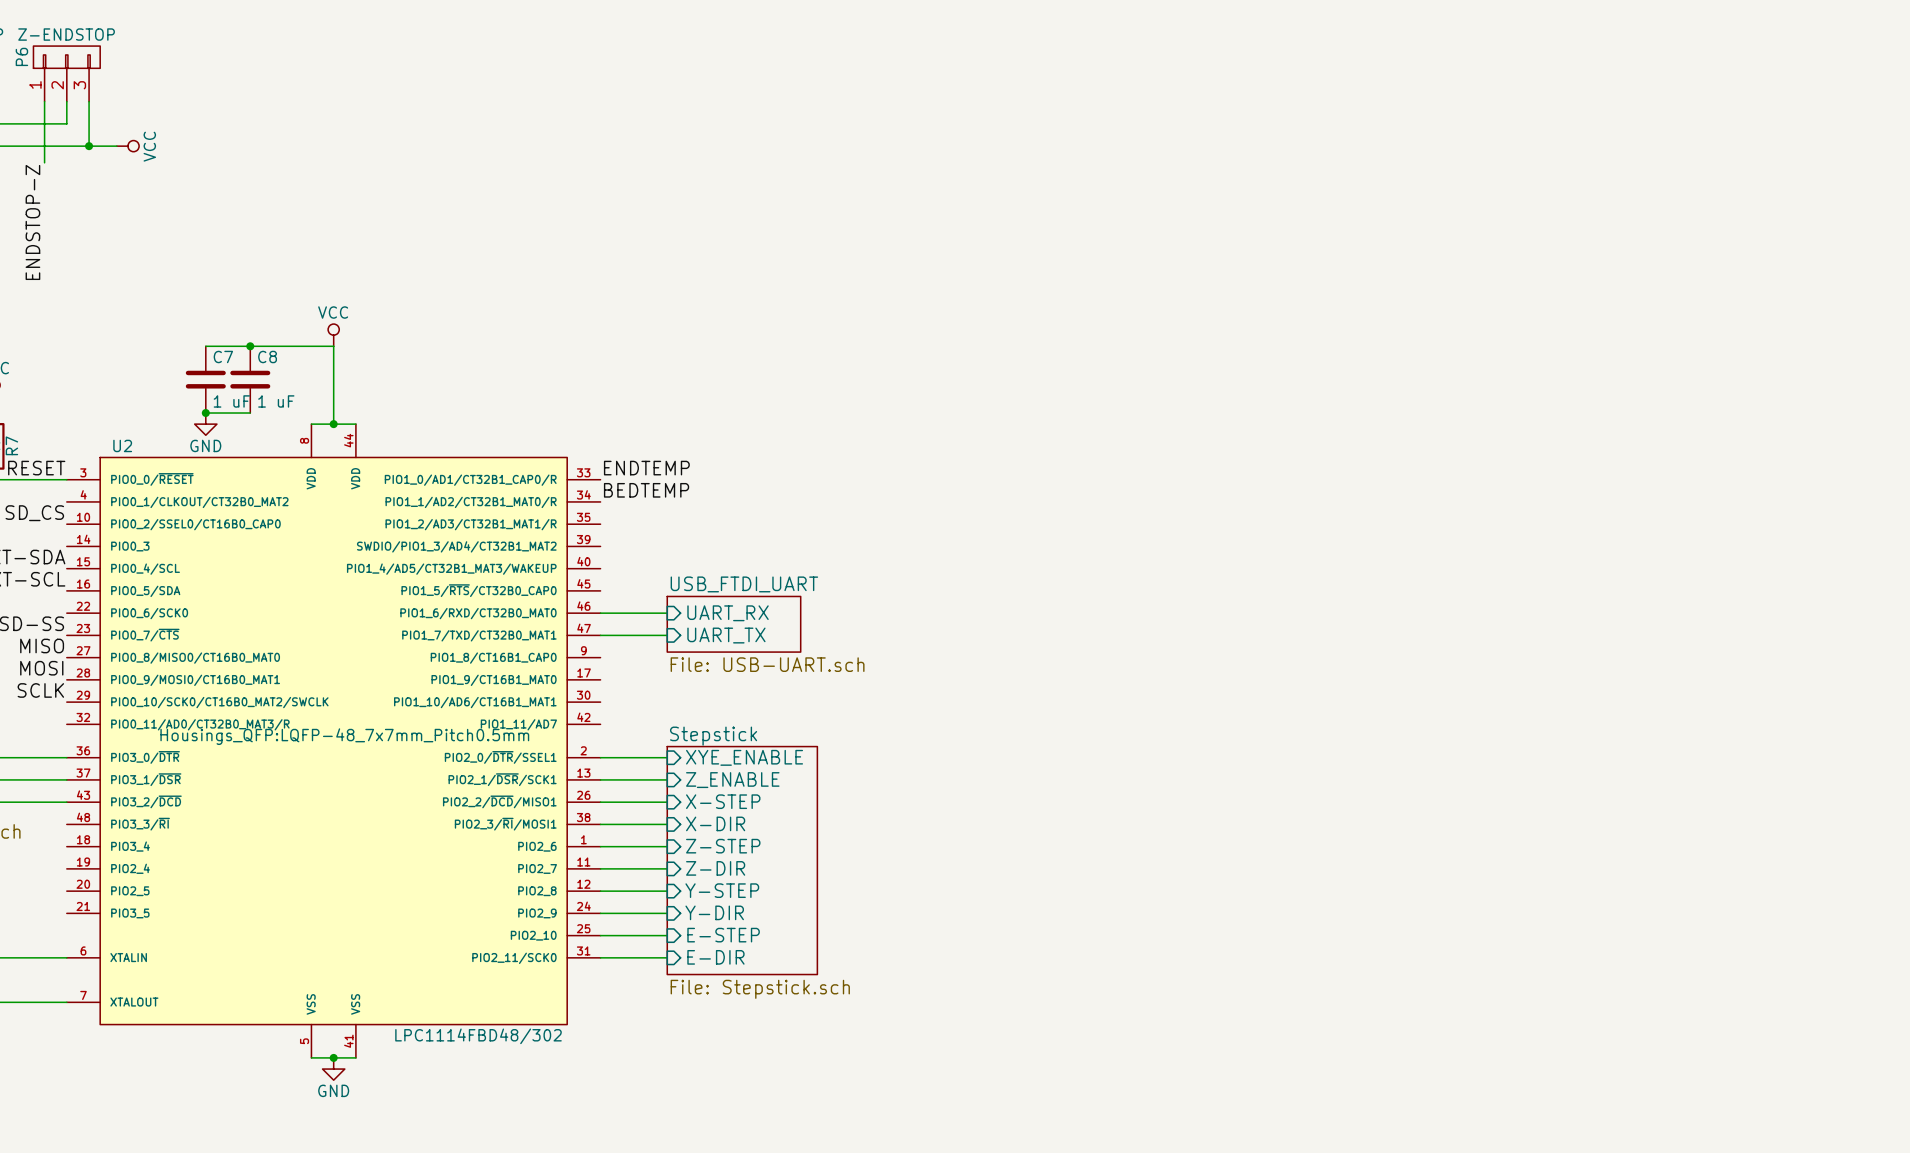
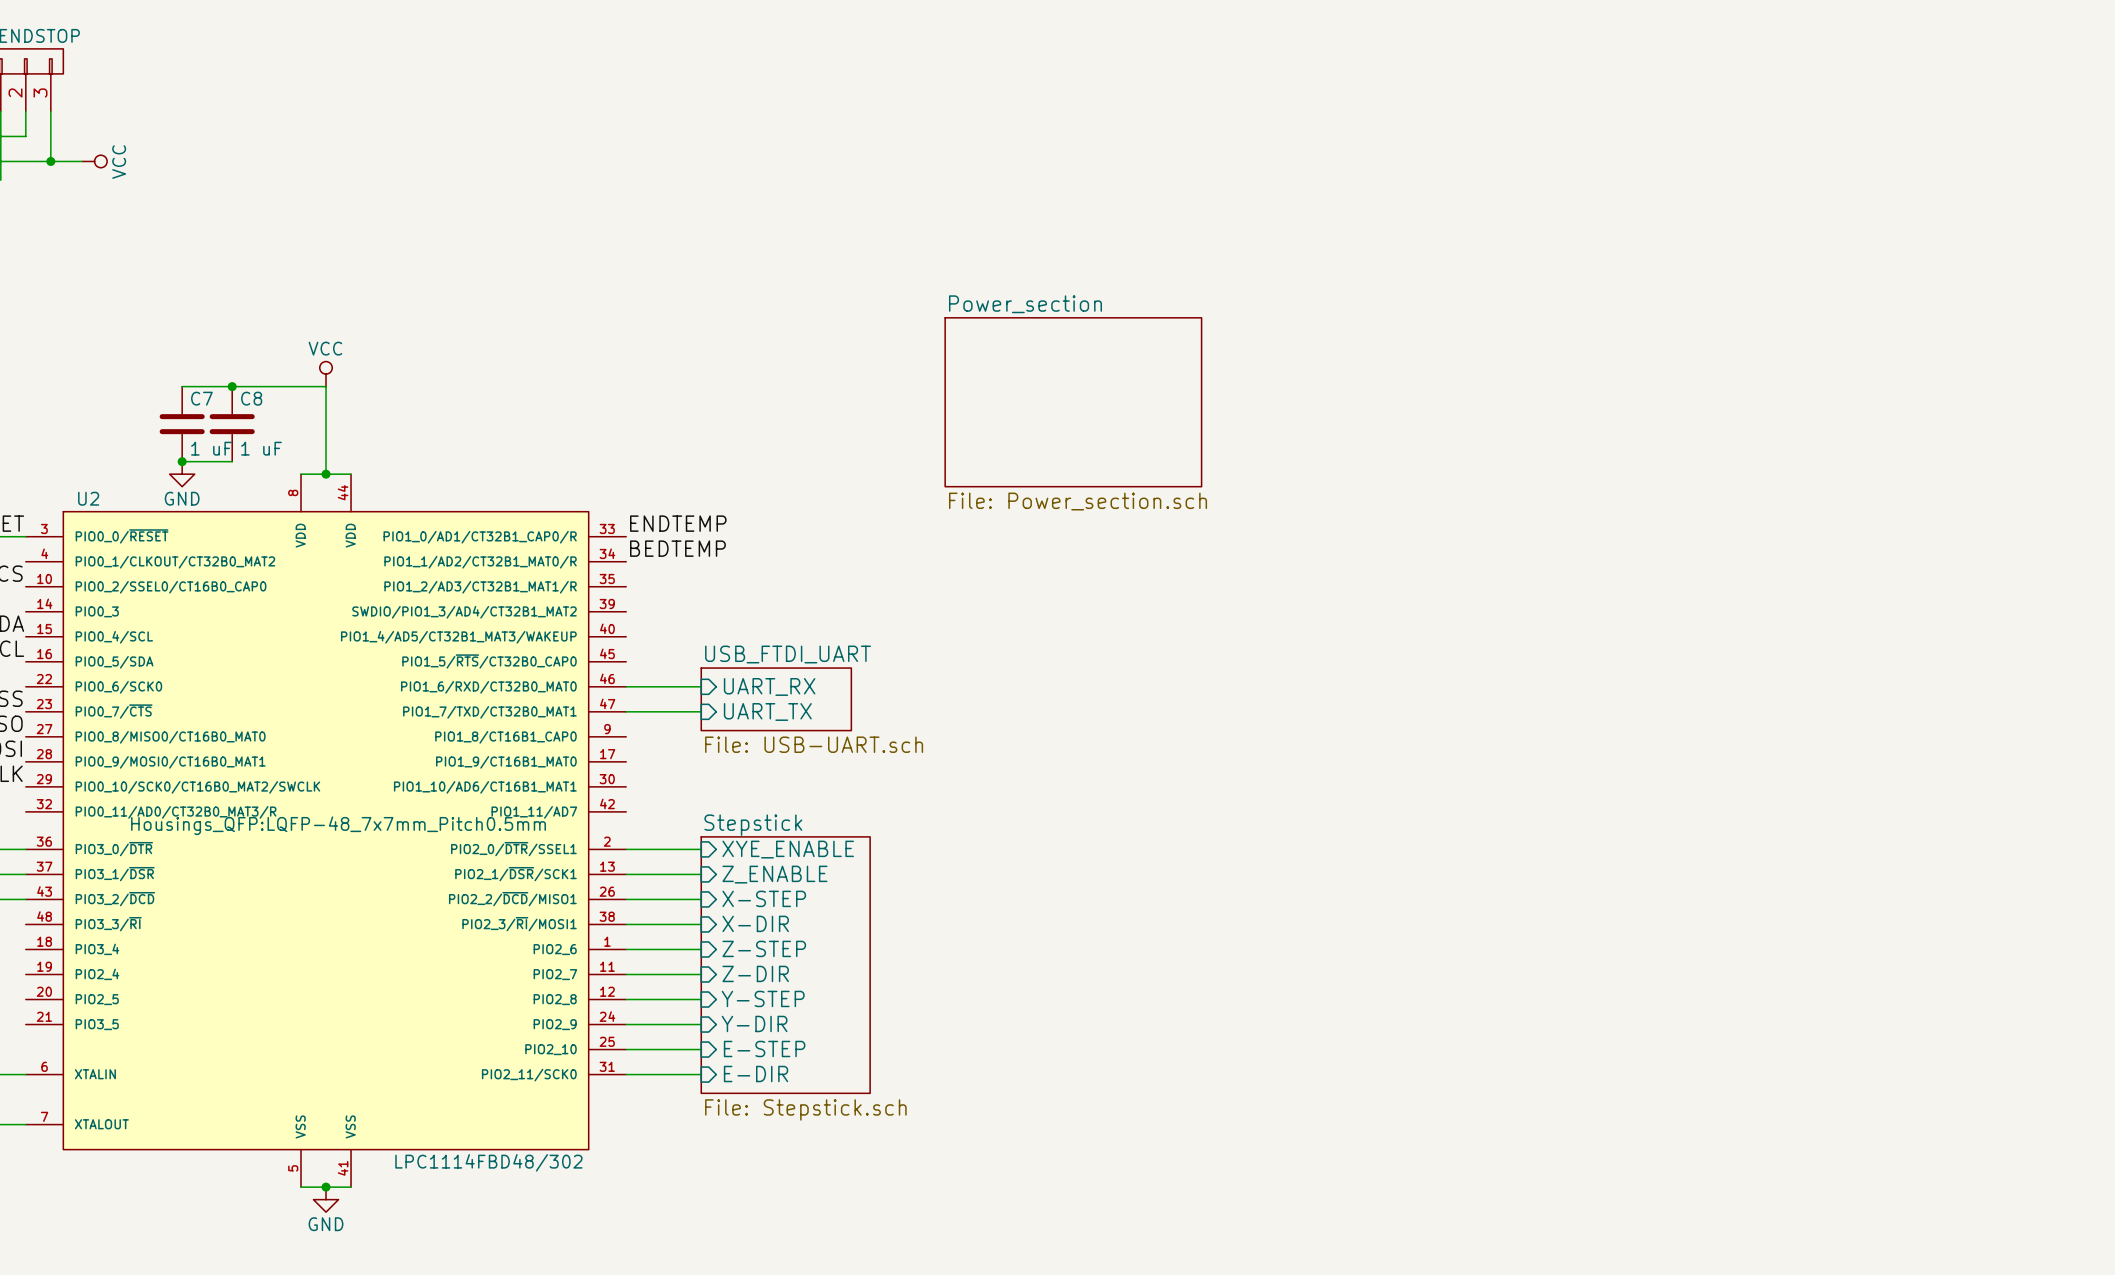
sheet Power_section: none -> File: Power_section.sch (1073, 402)

